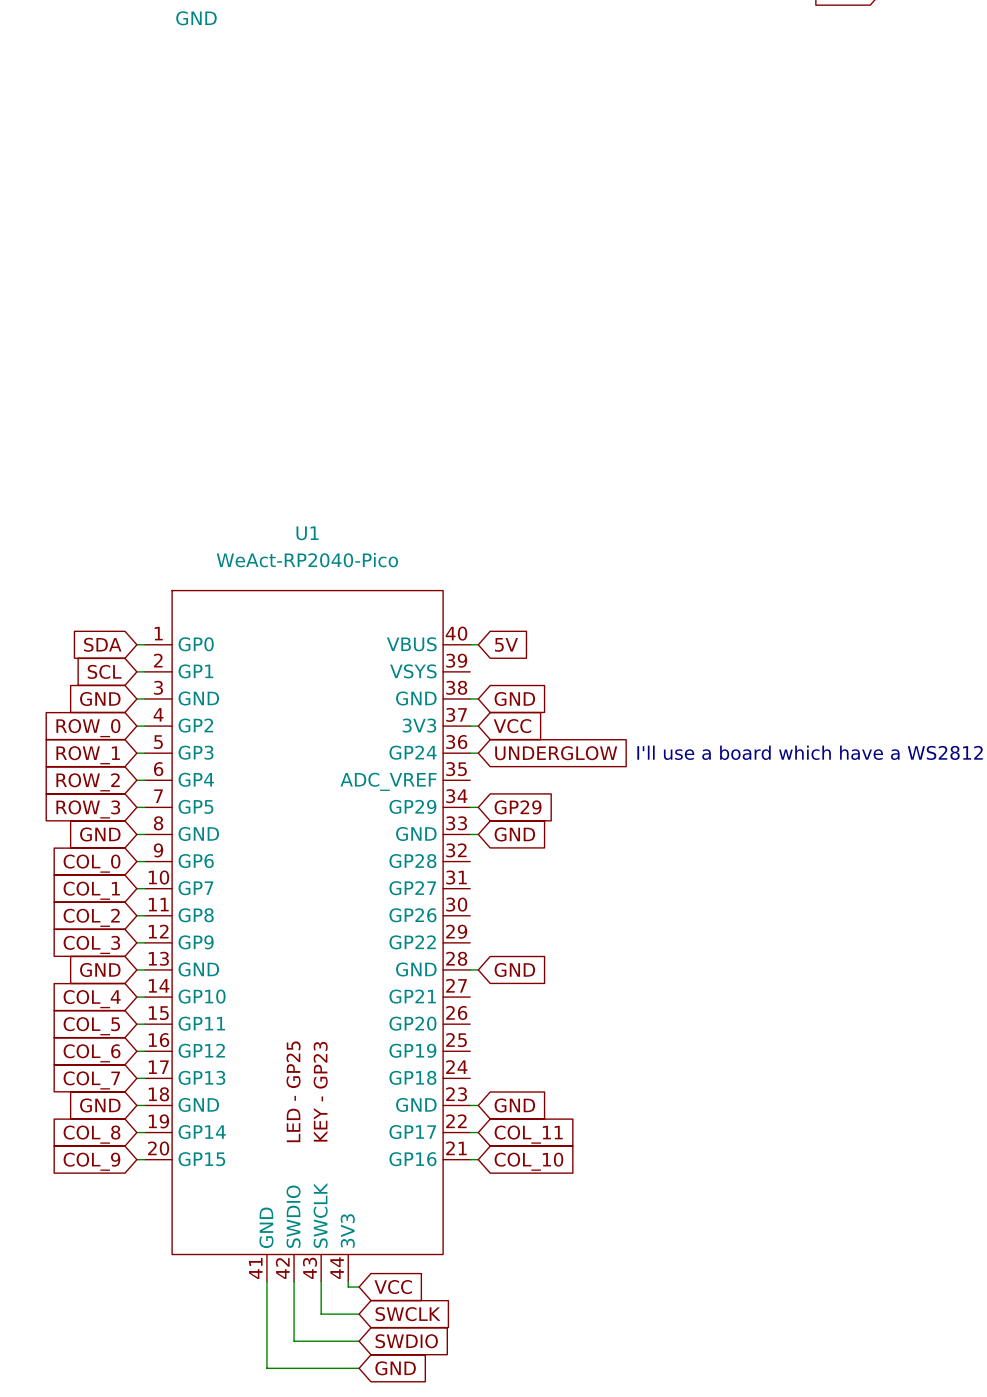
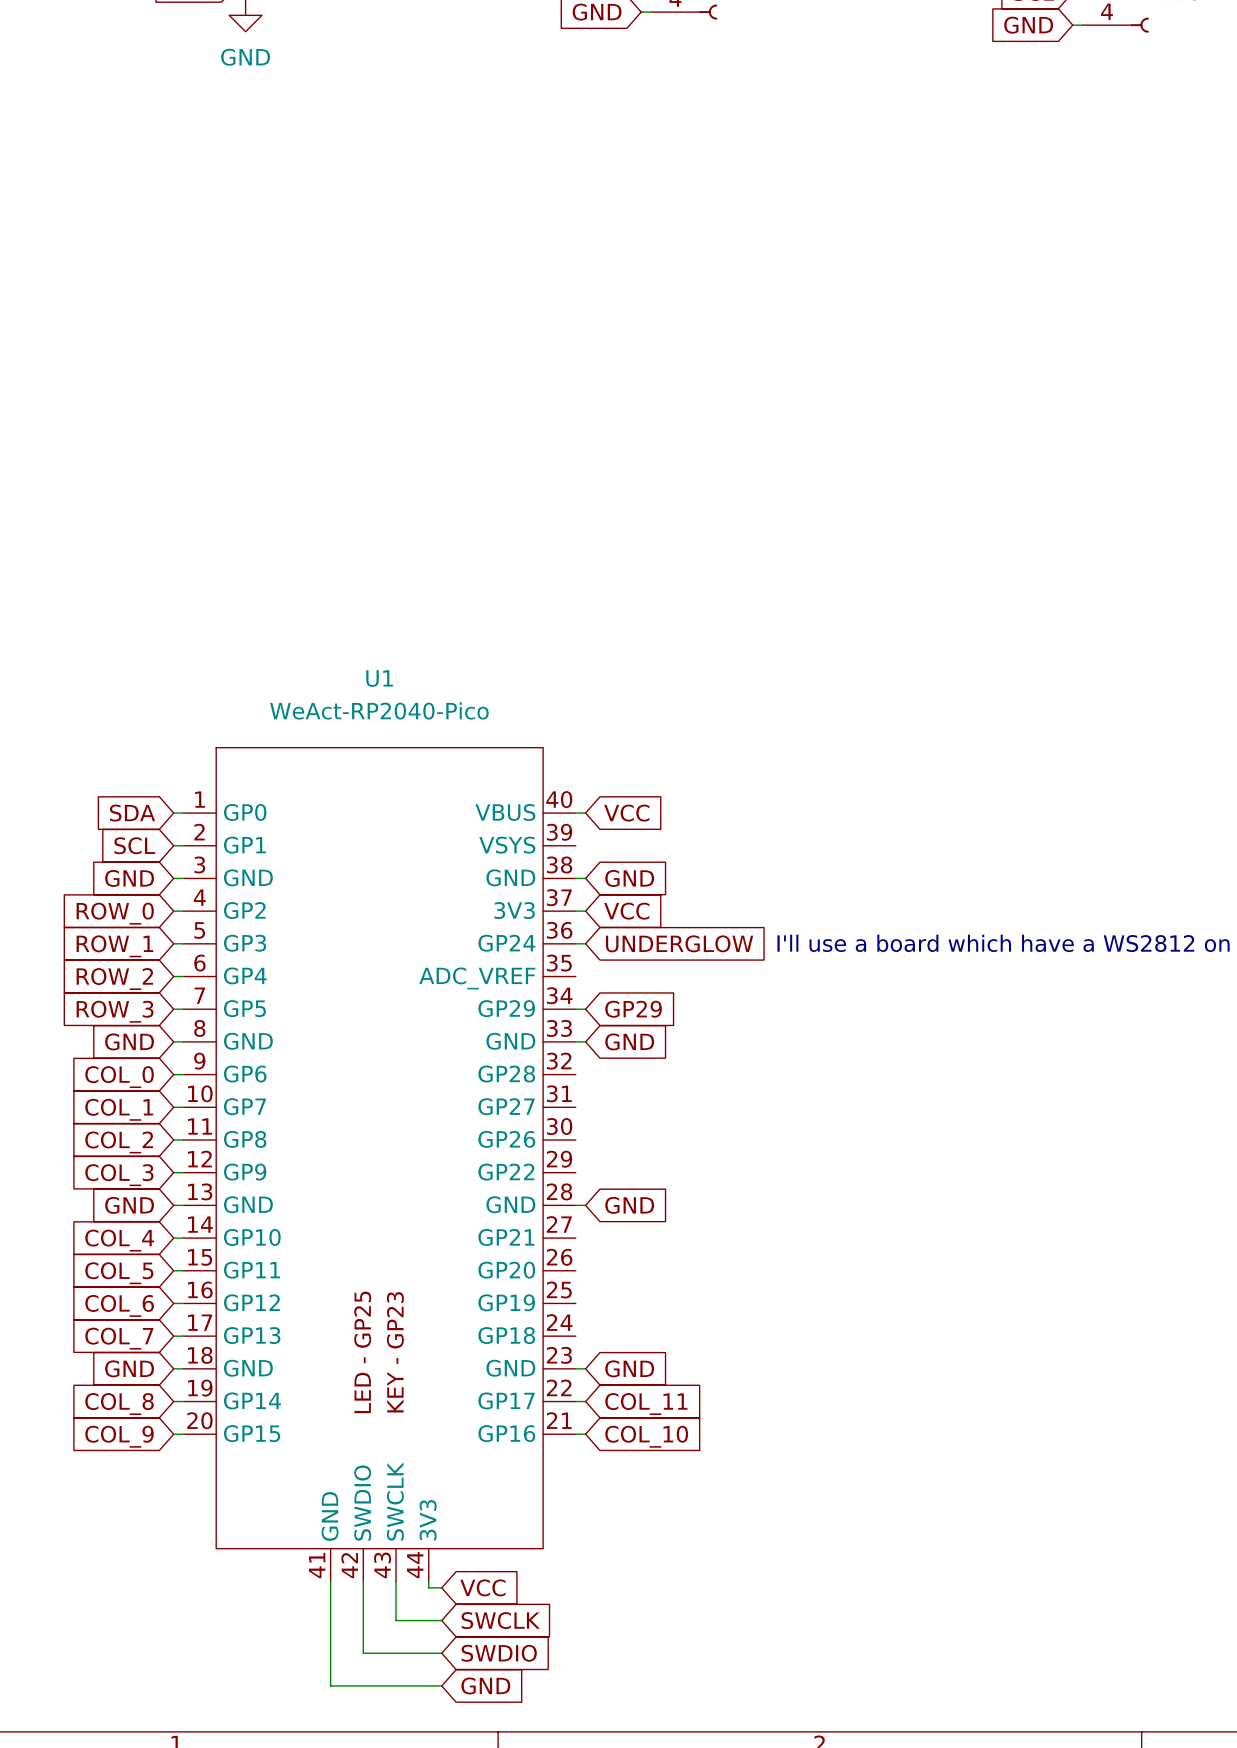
global label: 5V (506, 644) -> VCC (626, 813)

